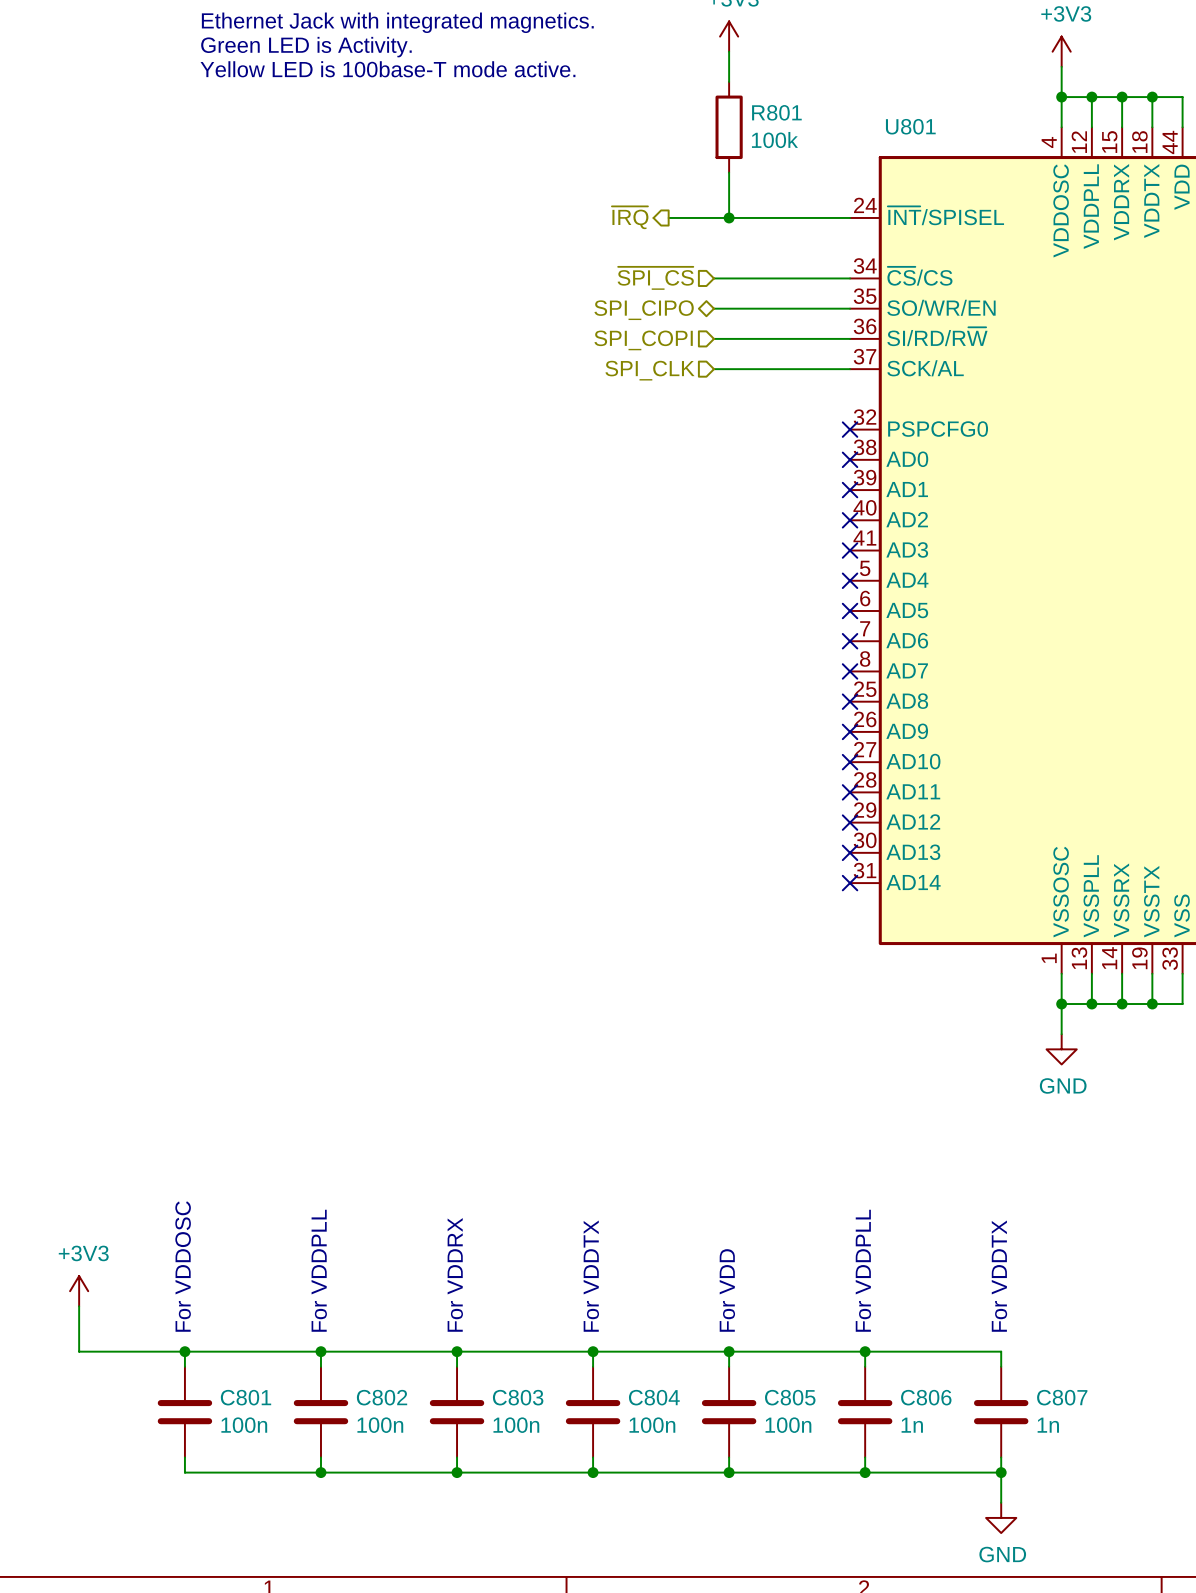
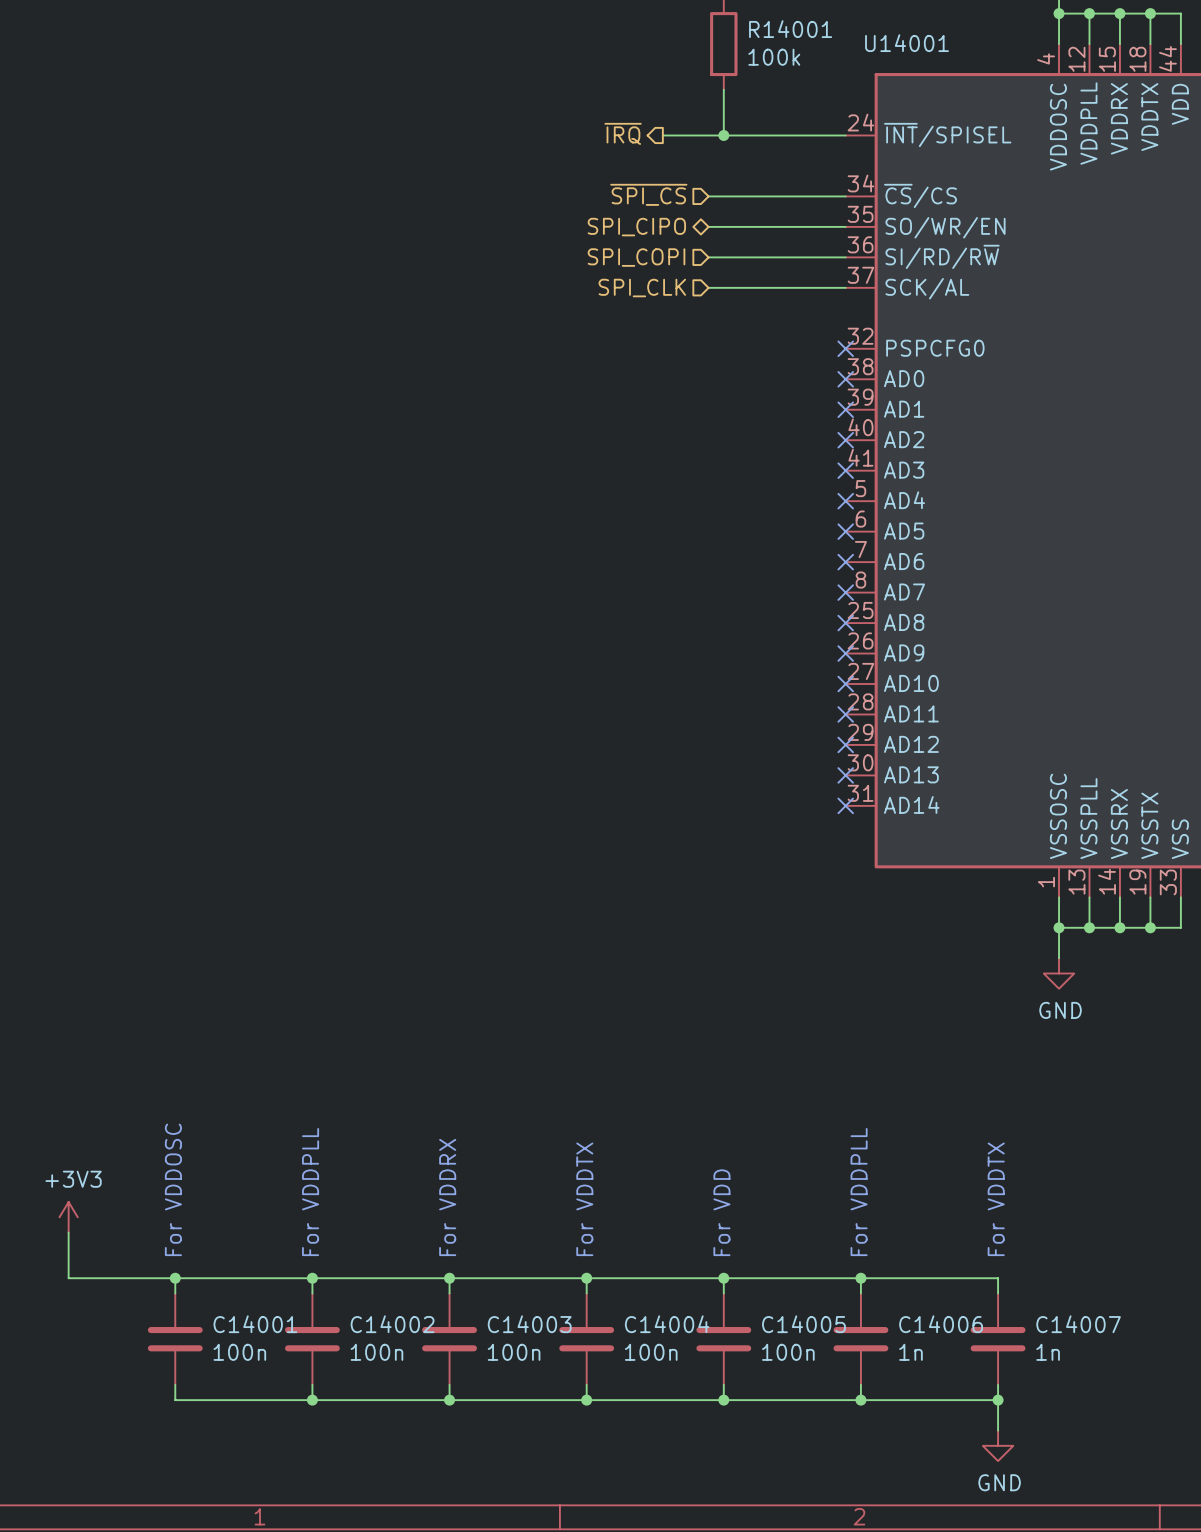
R801 name: R801 (776, 112) -> R14001 (790, 29)
U801 name: U801 (910, 126) -> U14001 (907, 43)
C801 name: C801 (246, 1397) -> C14001 (255, 1324)
C802 name: C802 (382, 1397) -> C14002 (392, 1324)
C803 name: C803 (518, 1397) -> C14003 (529, 1324)
C804 name: C804 (654, 1397) -> C14004 (667, 1324)
C805 name: C805 (790, 1397) -> C14005 (803, 1324)
C806 name: C806 (926, 1397) -> C14006 (941, 1324)
C807 name: C807 (1062, 1397) -> C14007 (1078, 1324)

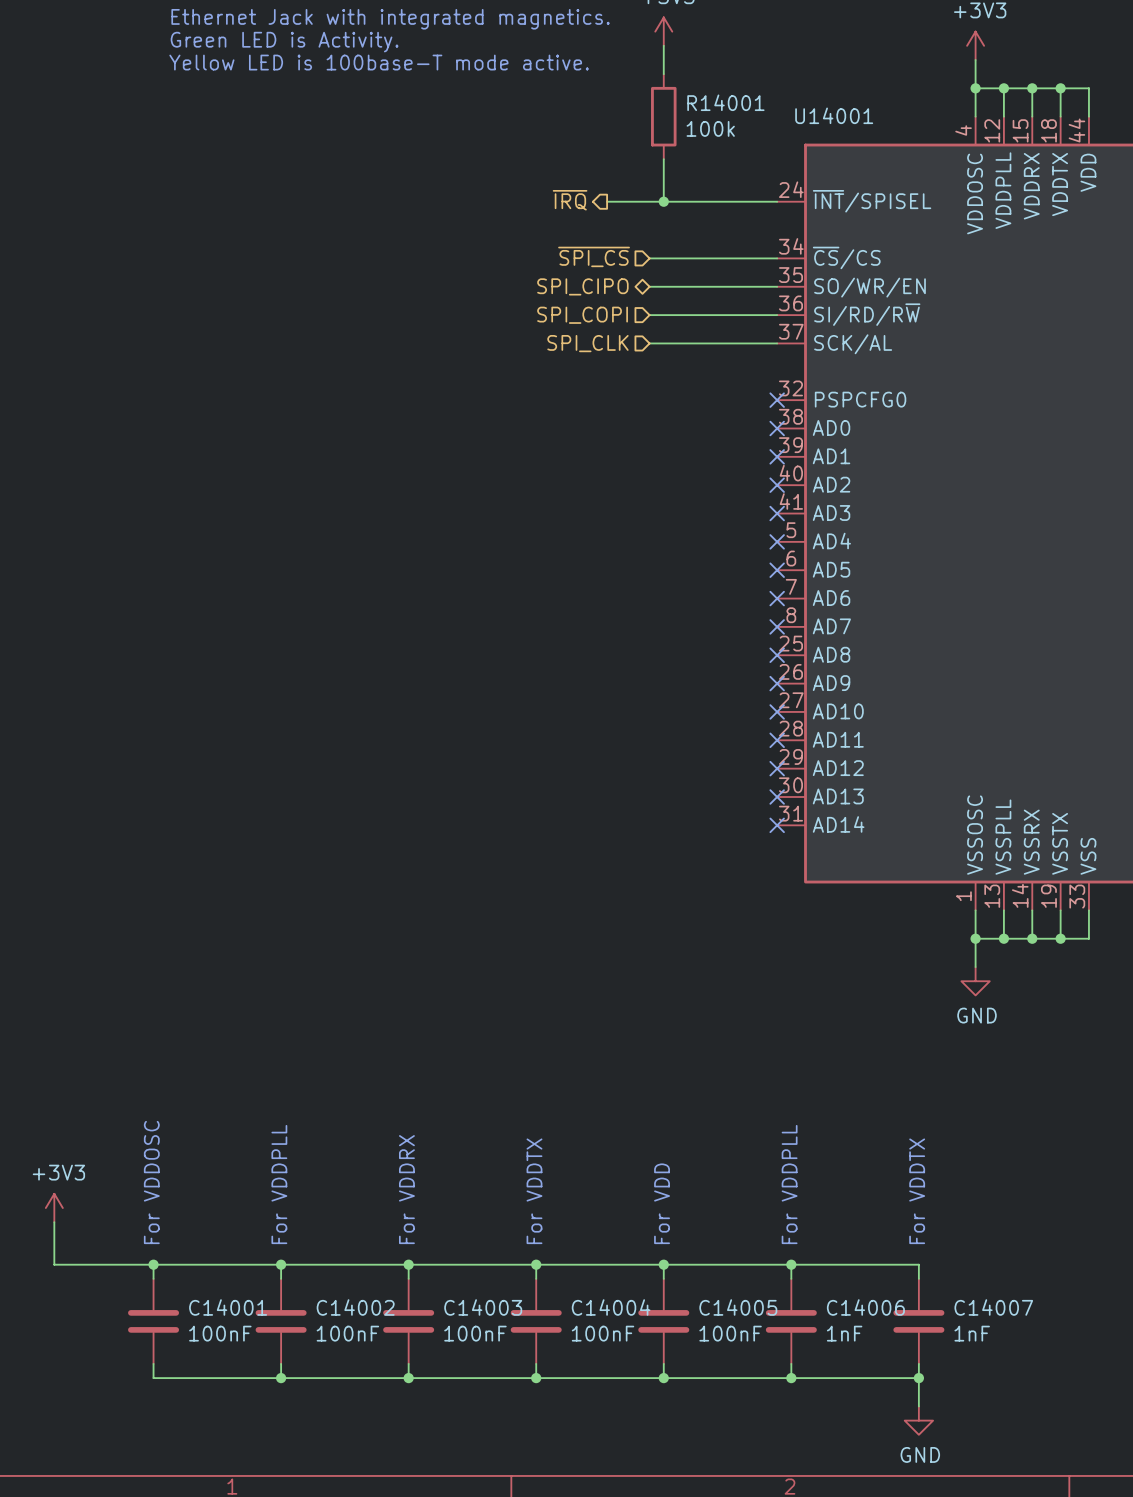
C14001 value: 100n (239, 1352) -> 100nF (220, 1333)
C14002 value: 100n (376, 1352) -> 100nF (347, 1333)
C14003 value: 100n (514, 1352) -> 100nF (475, 1333)
C14004 value: 100n (651, 1352) -> 100nF (603, 1333)
C14005 value: 100n (788, 1352) -> 100nF (730, 1333)
C14006 value: 1n (910, 1352) -> 1nF (844, 1333)
C14007 value: 1n (1048, 1352) -> 1nF (972, 1333)

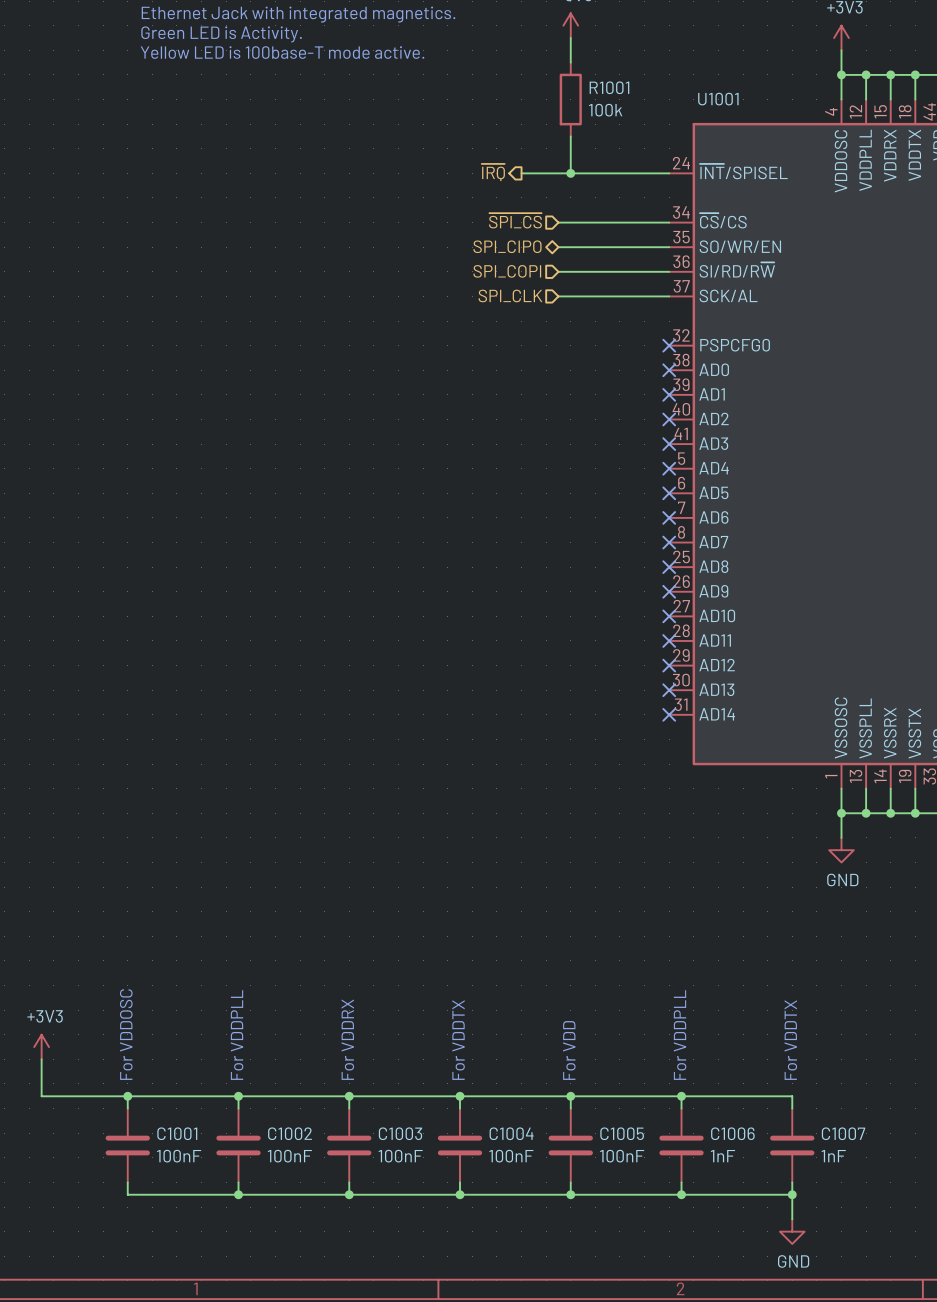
R14001 name: R14001 (725, 102) -> R1001 (609, 87)
U14001 name: U14001 (834, 115) -> U1001 (718, 99)
C14001 name: C14001 (228, 1307) -> C1001 (177, 1133)
C14002 name: C14002 (355, 1307) -> C1002 (290, 1133)
C14003 name: C14003 (483, 1307) -> C1003 (400, 1133)
C14004 name: C14004 (611, 1307) -> C1004 (511, 1133)
C14005 name: C14005 (738, 1307) -> C1005 (622, 1133)
C14006 name: C14006 (865, 1307) -> C1006 (732, 1133)
C14007 name: C14007 (993, 1307) -> C1007 (843, 1133)

